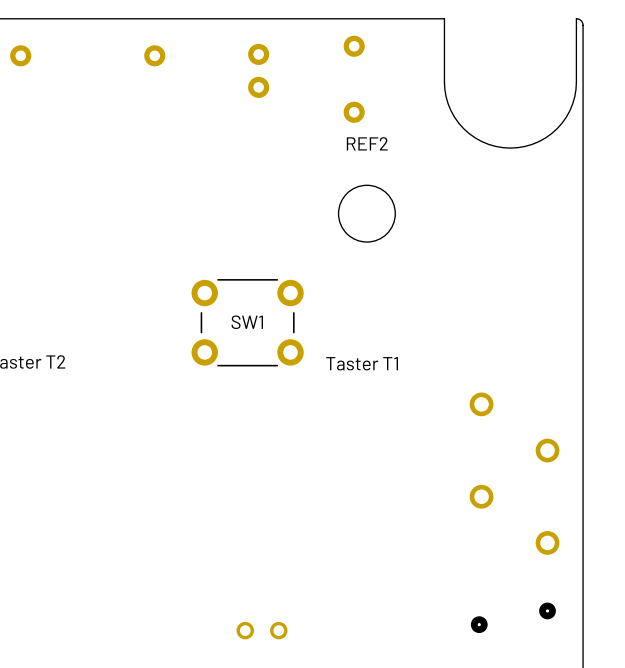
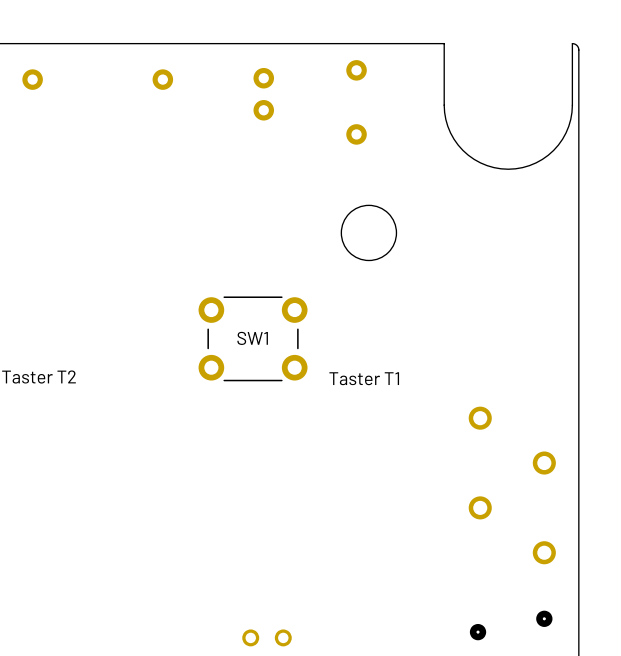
REF2 name: REF2 (367, 143) -> none

